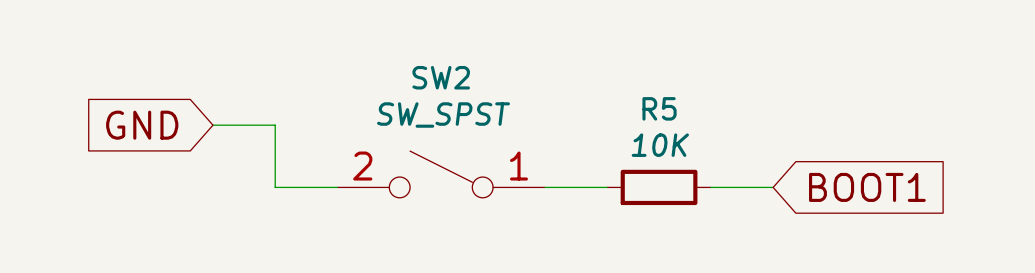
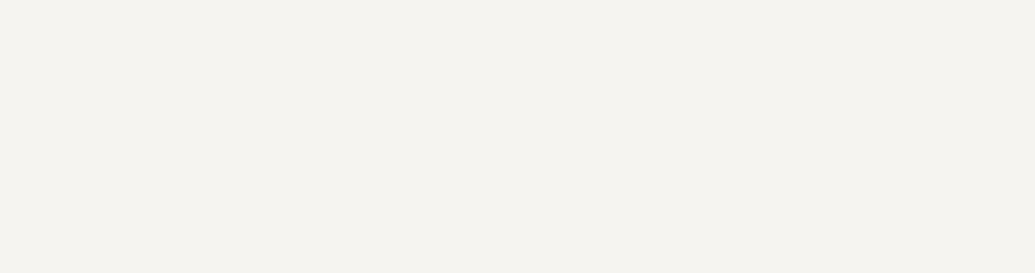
global label: GND (142, 125) -> none
wire: (212, 125) (275, 125) (275, 187) (337, 187) -> none
SW2: SW_SPST (441, 174) -> none
wire: (544, 187) (607, 187) -> none
R5: 10K (659, 187) -> none
wire: (710, 187) (773, 187) -> none
global label: BOOT1 (867, 187) -> none

